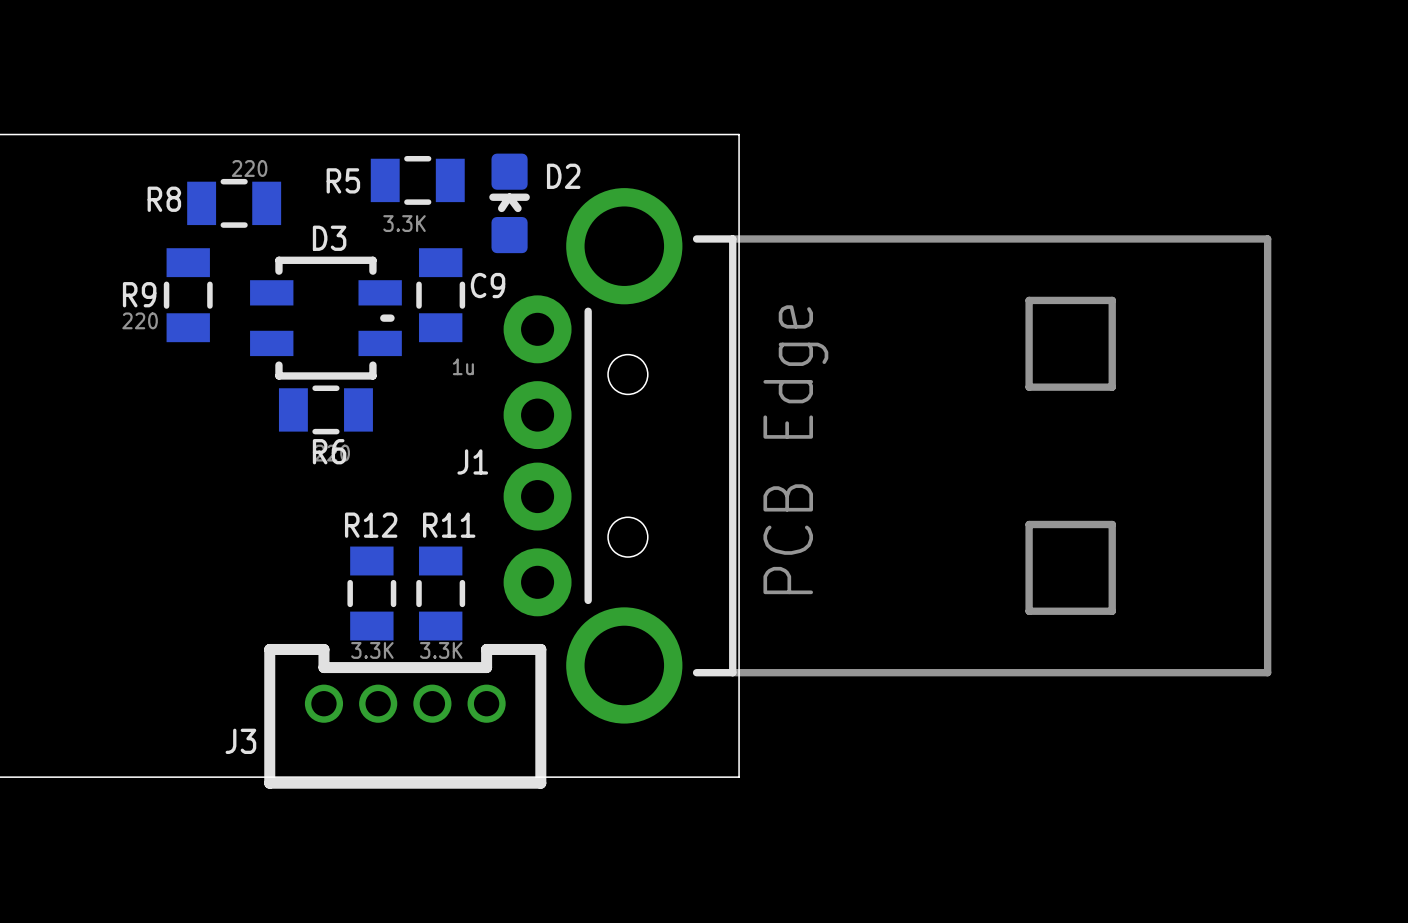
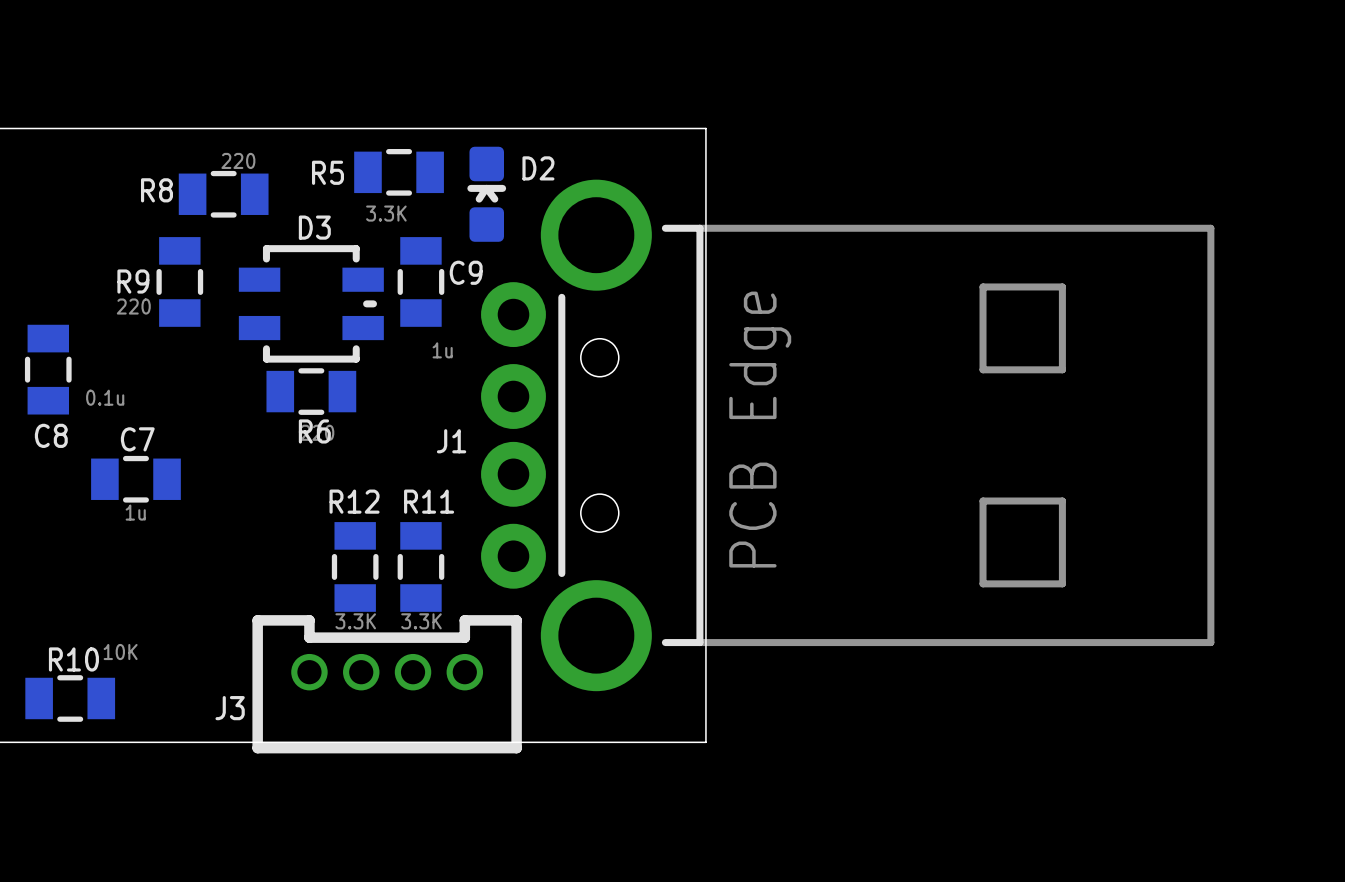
C8: none -> 0.1u (48, 369)
C7: none -> 1u (135, 479)
R10: none -> 10K (70, 698)

